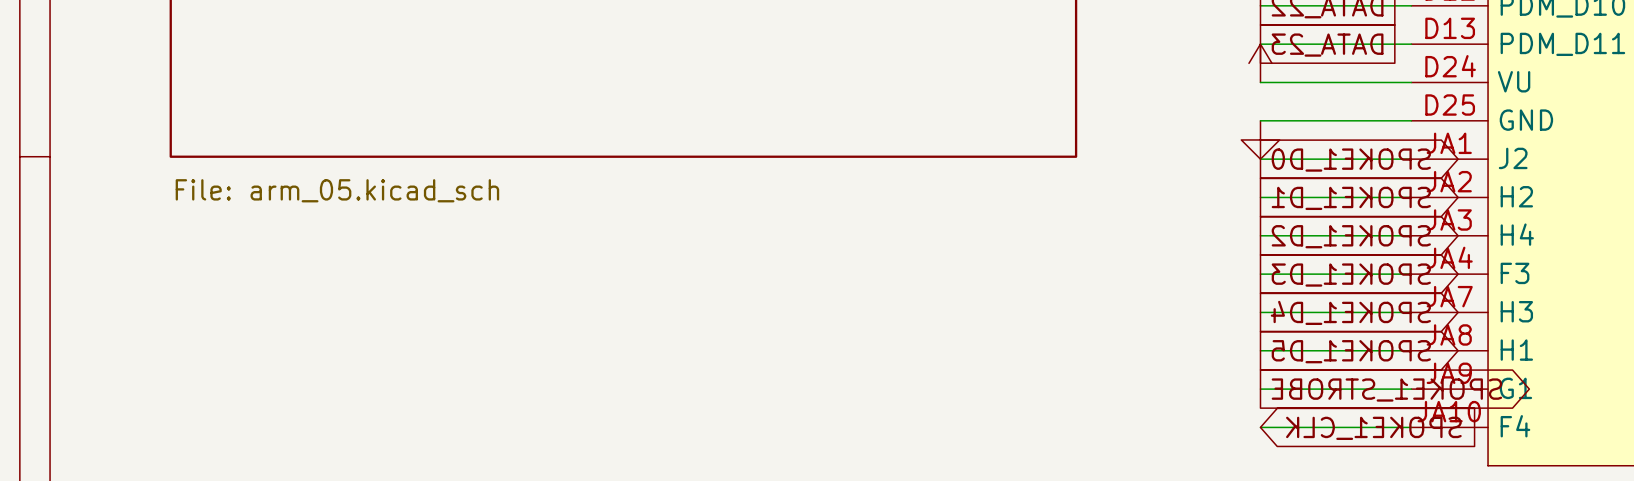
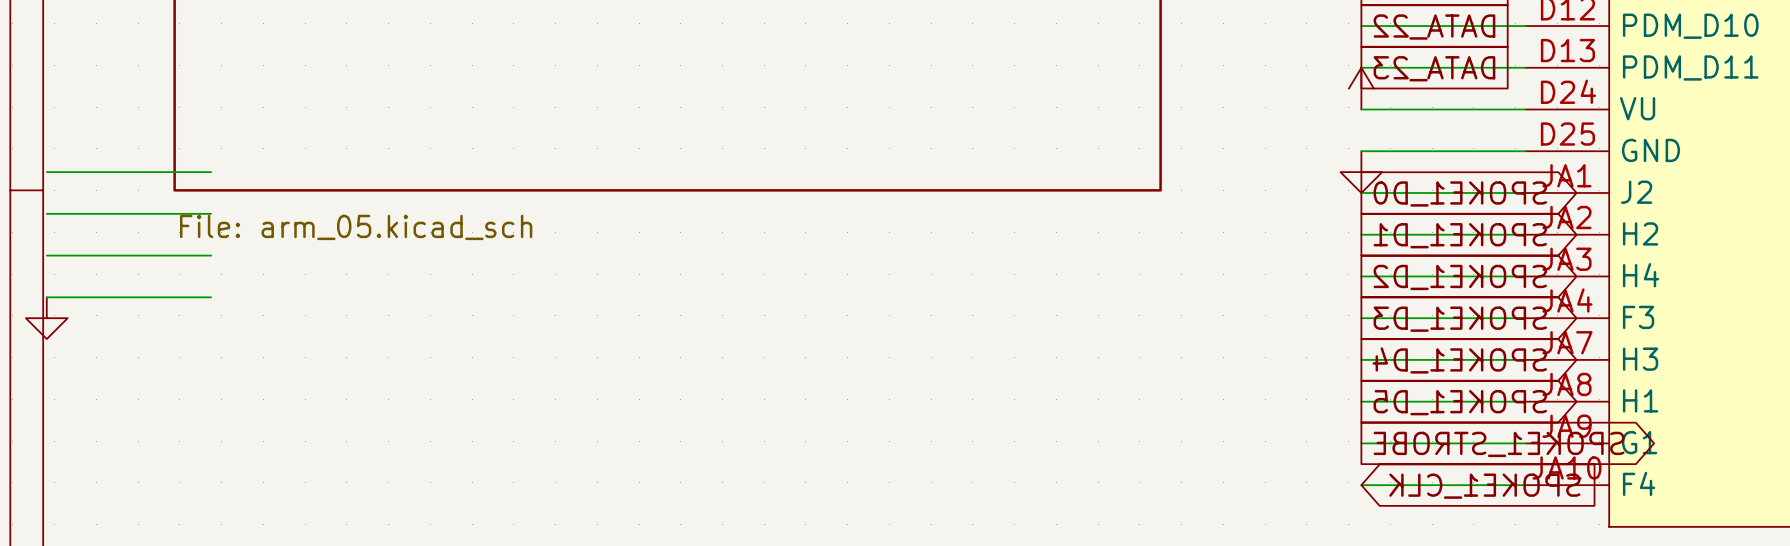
wire: none -> (46, 172) (211, 172)
wire: none -> (46, 213) (211, 213)
wire: none -> (46, 255) (211, 255)
wire: none -> (46, 297) (211, 297)
power symbol: none -> (46, 318)

